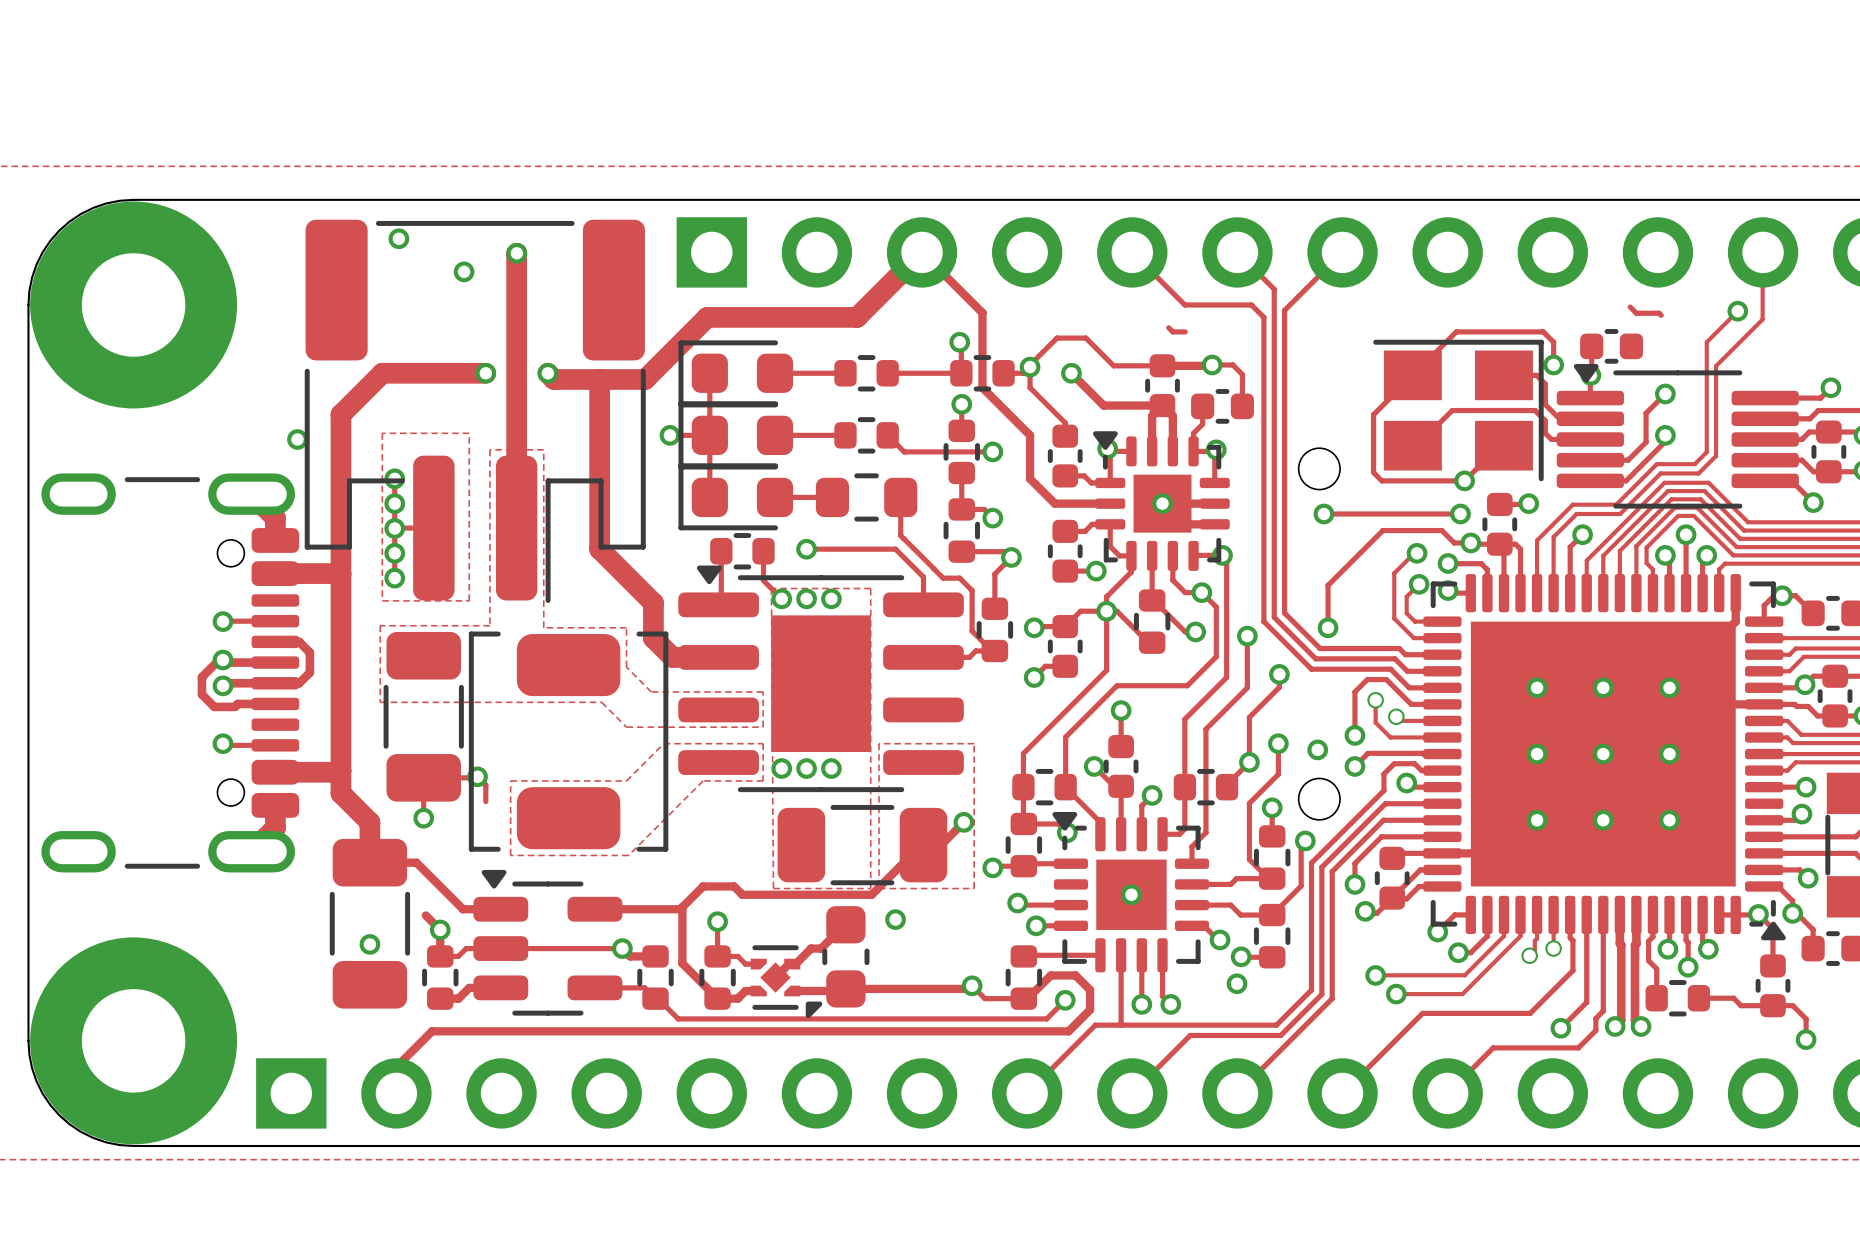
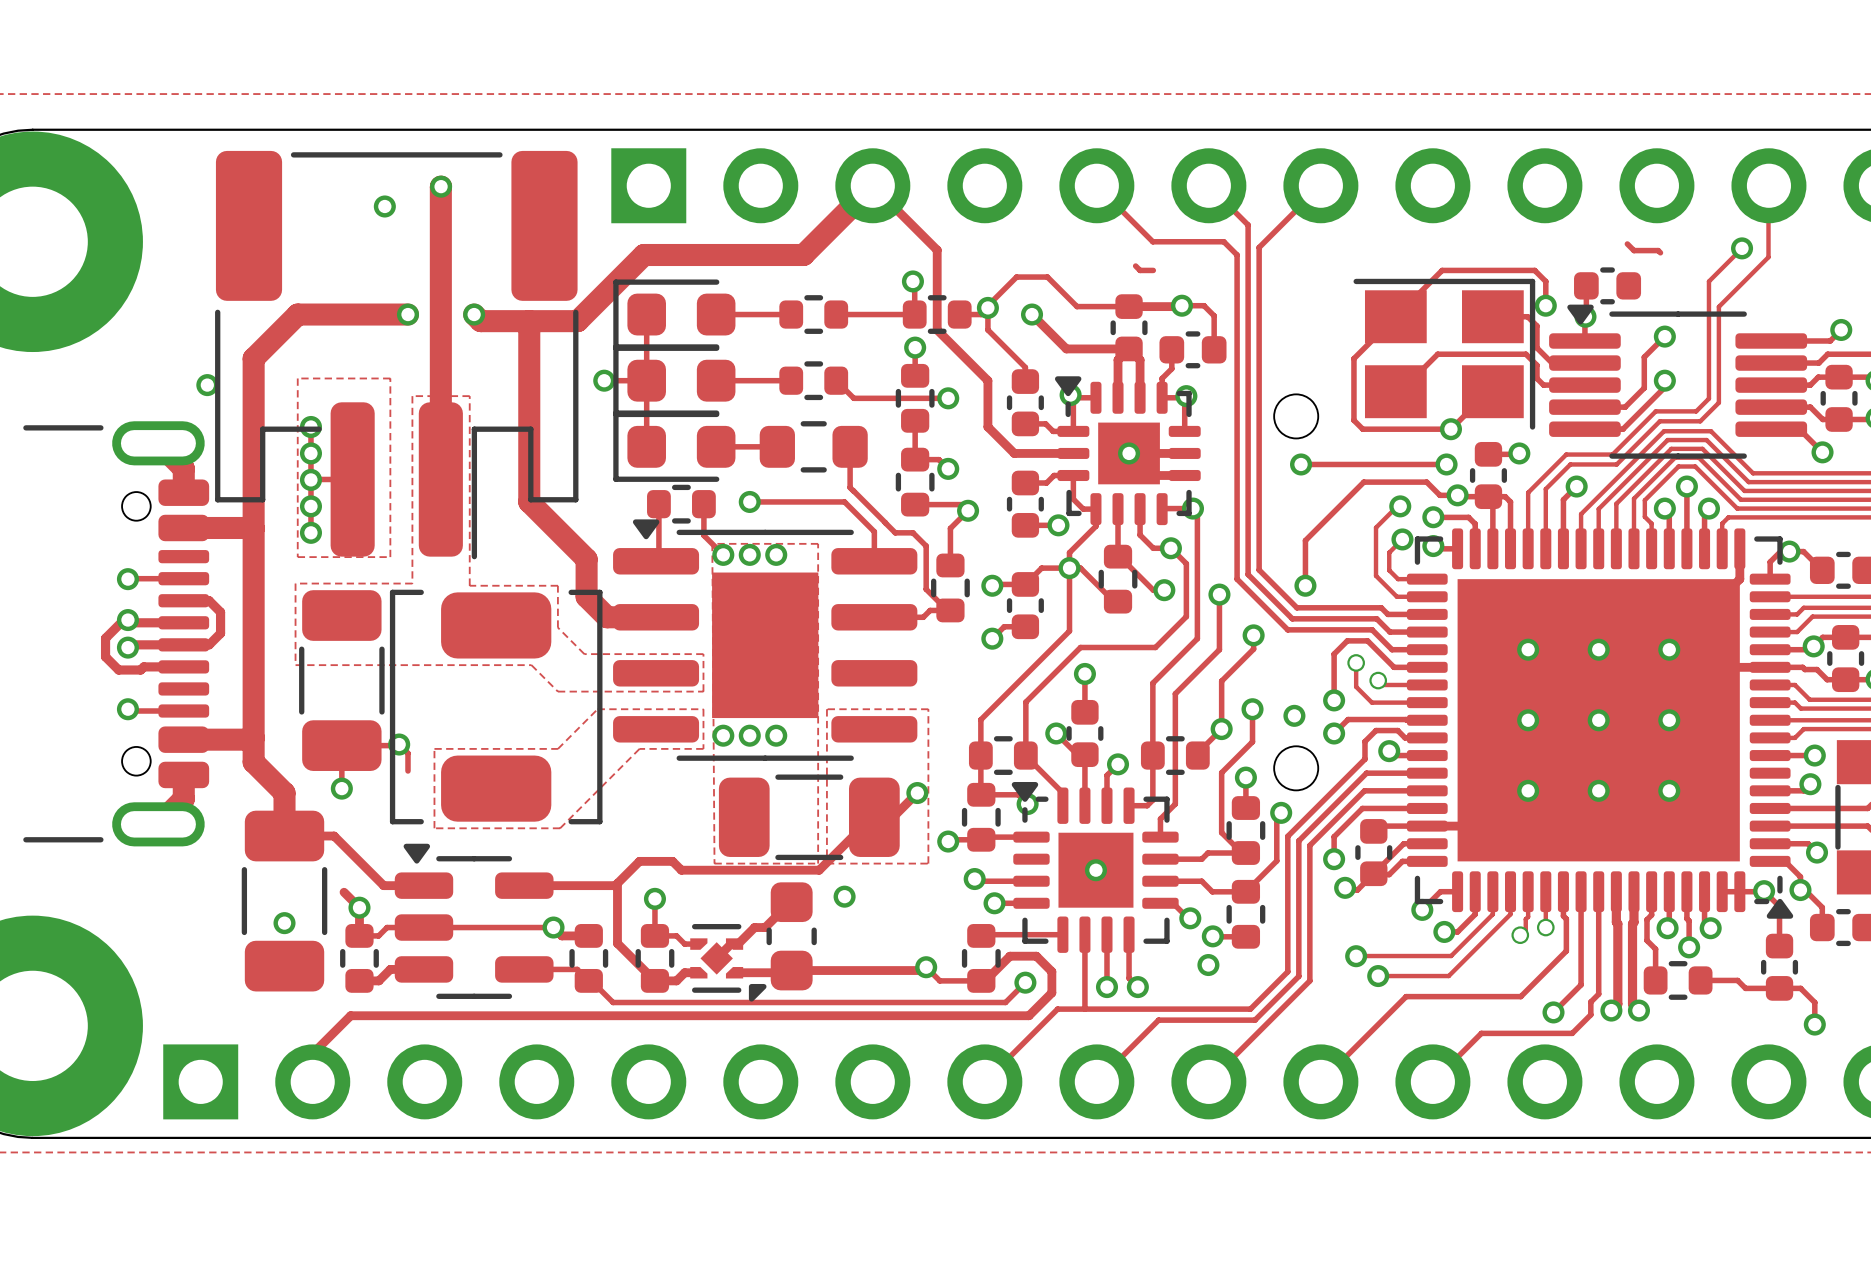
via: (398, 238) -> none

